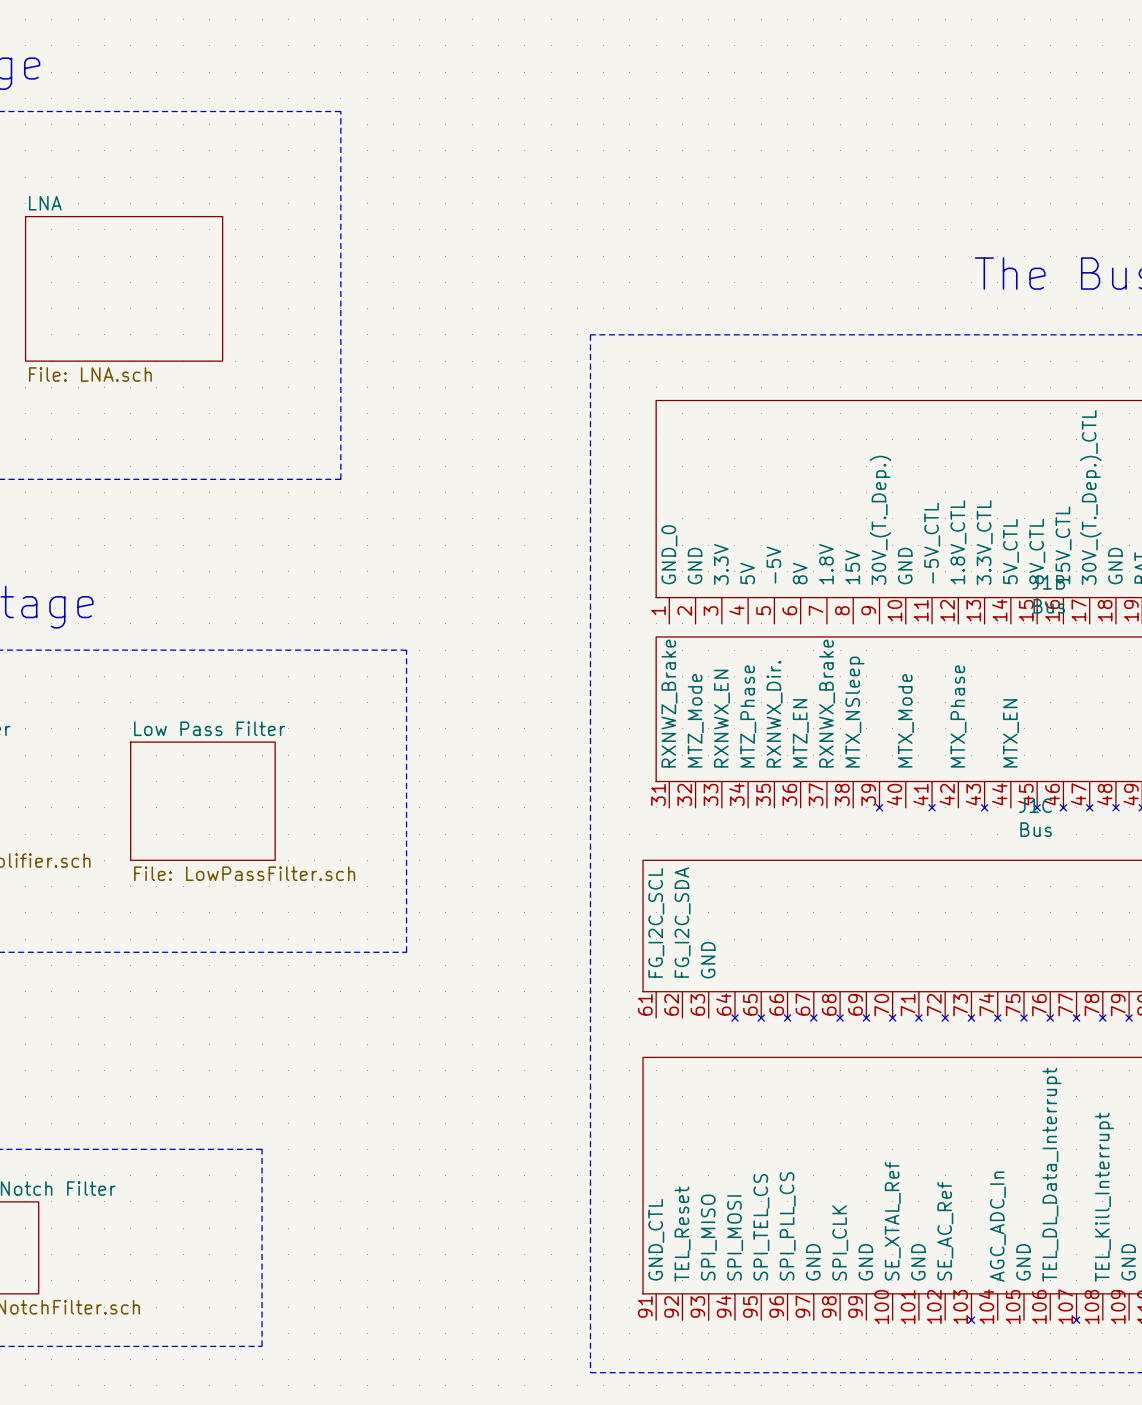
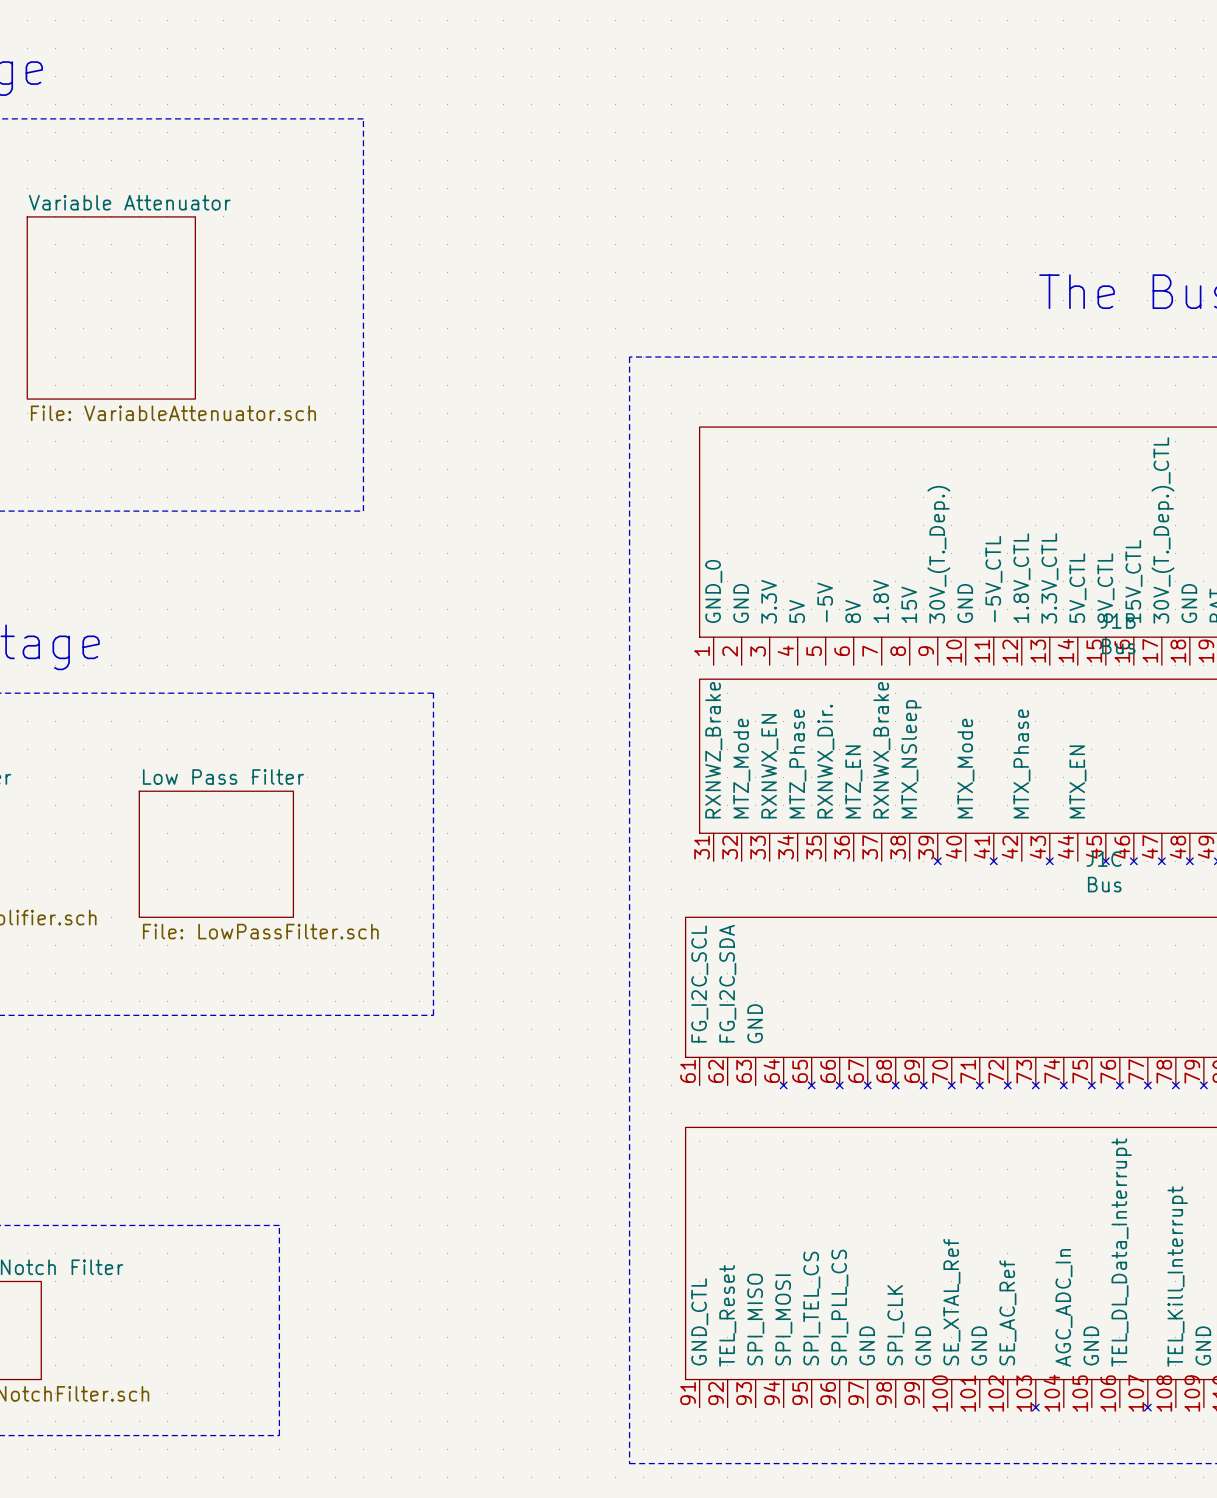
sheet Variable Attenuator: none -> File: VariableAttenuator.sch (111, 307)
sheet LNA: File: LNA.sch (124, 288) -> none

